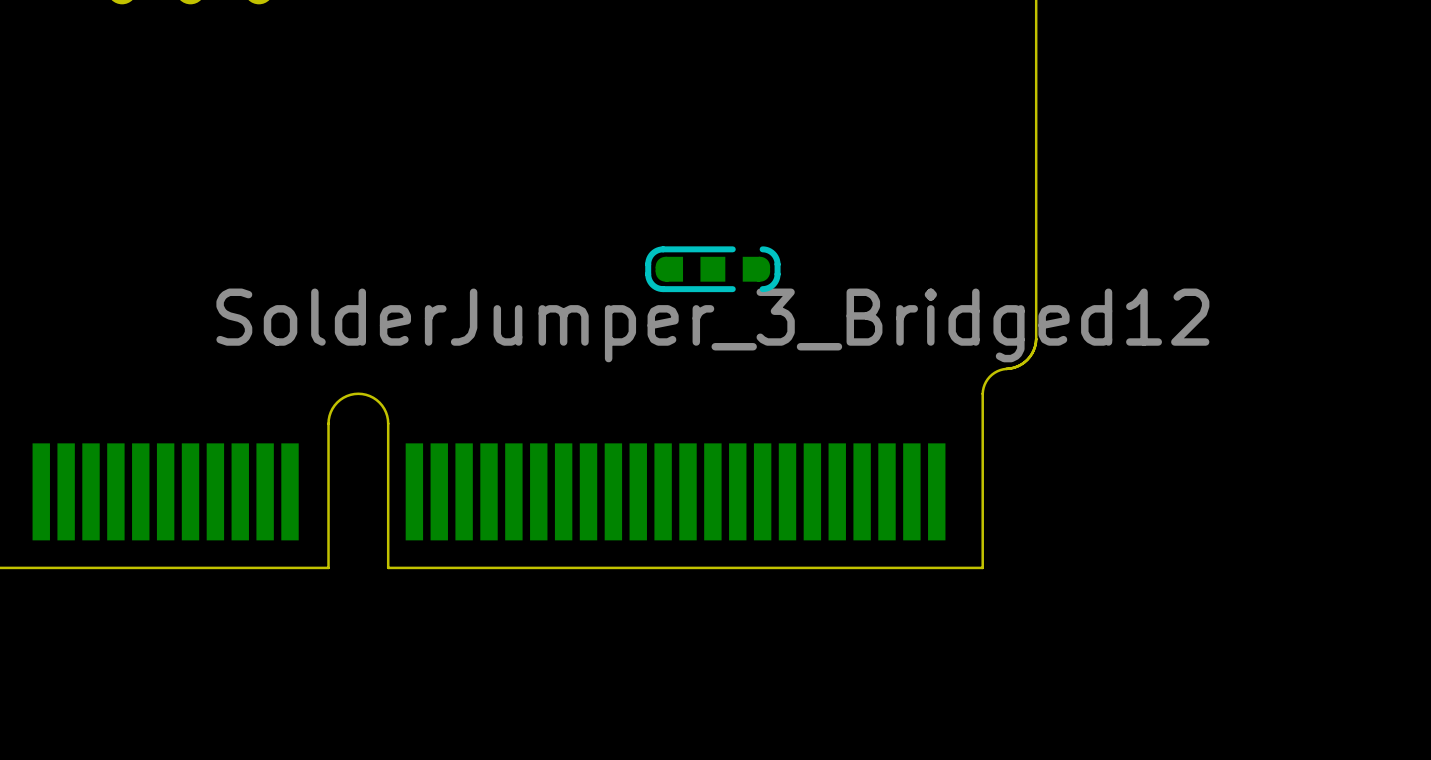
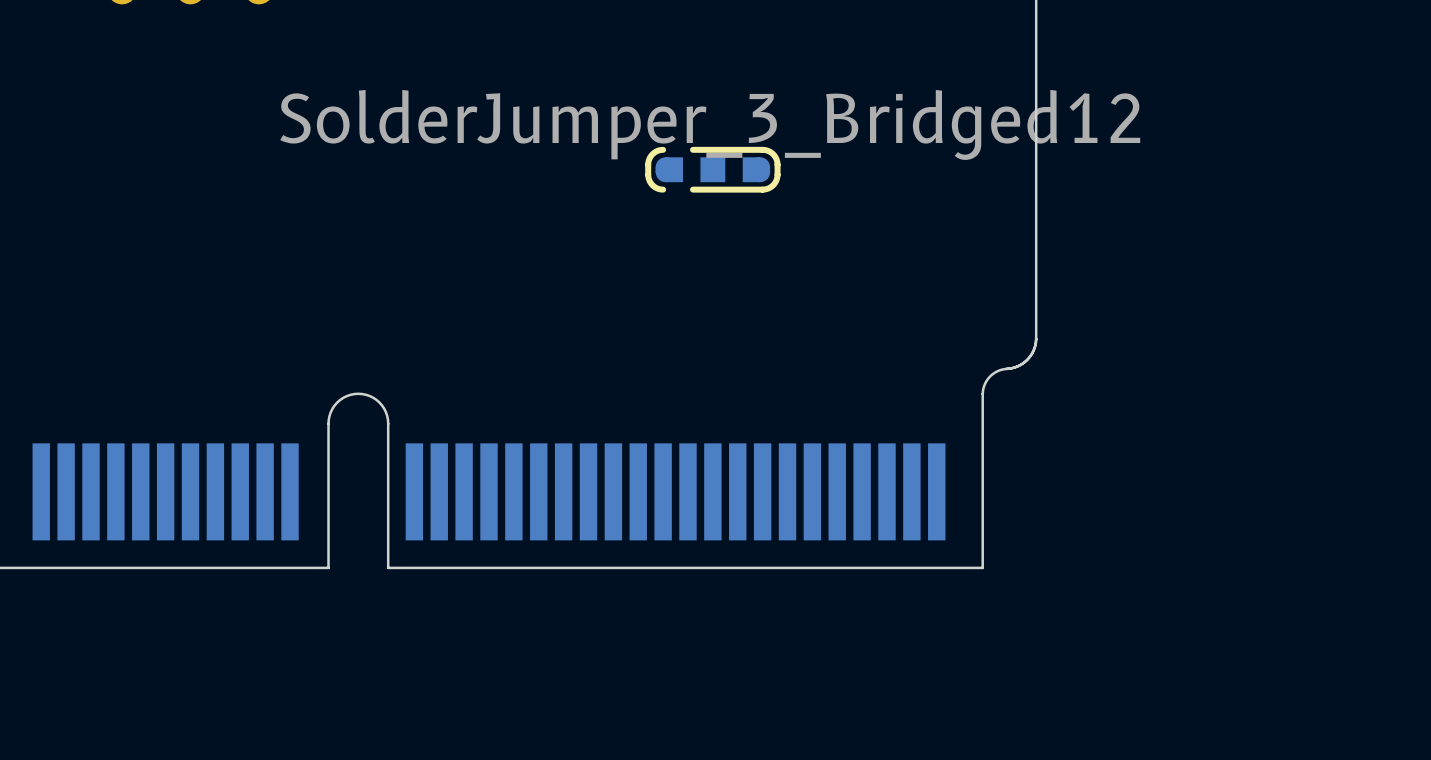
part rotation: 0° (712, 269) -> 180° (712, 169)
part position: (712, 269) -> (712, 169)

